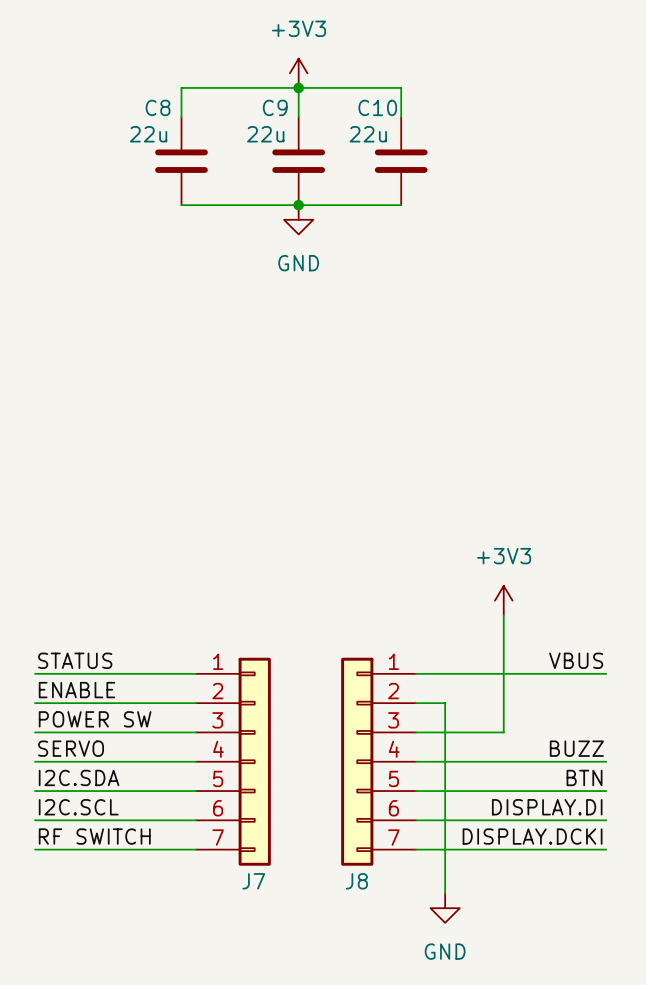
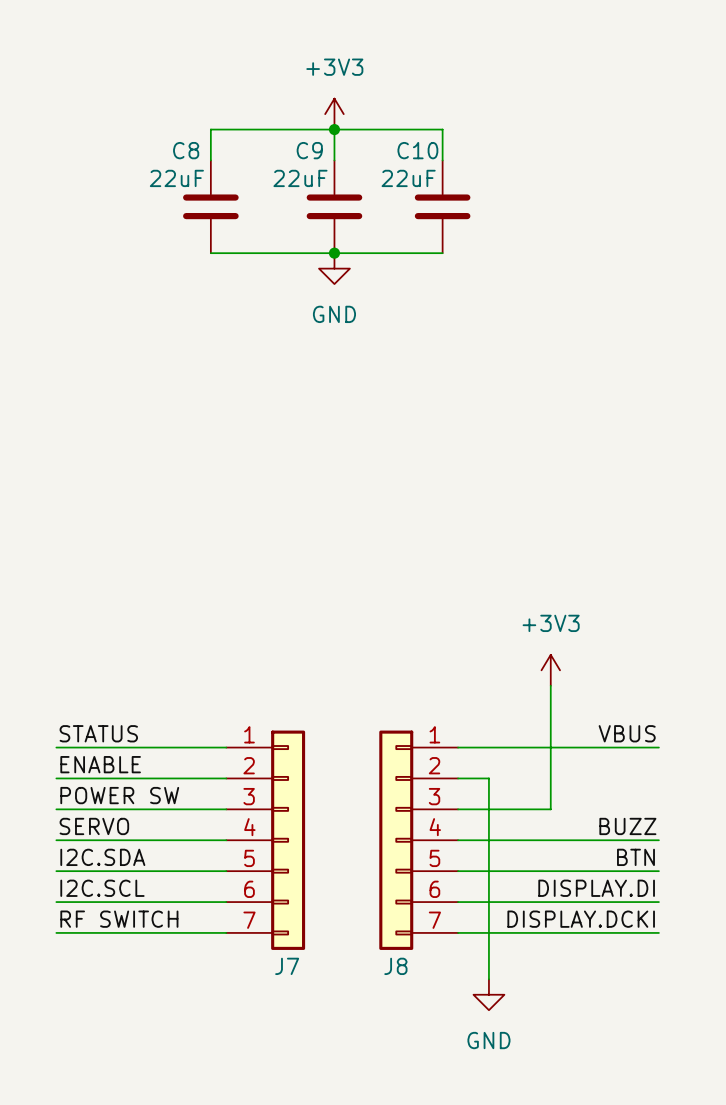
C8 value: 22u (148, 134) -> 22uF (176, 178)
C9 value: 22u (265, 134) -> 22uF (300, 178)
C10 value: 22u (368, 134) -> 22uF (408, 178)

